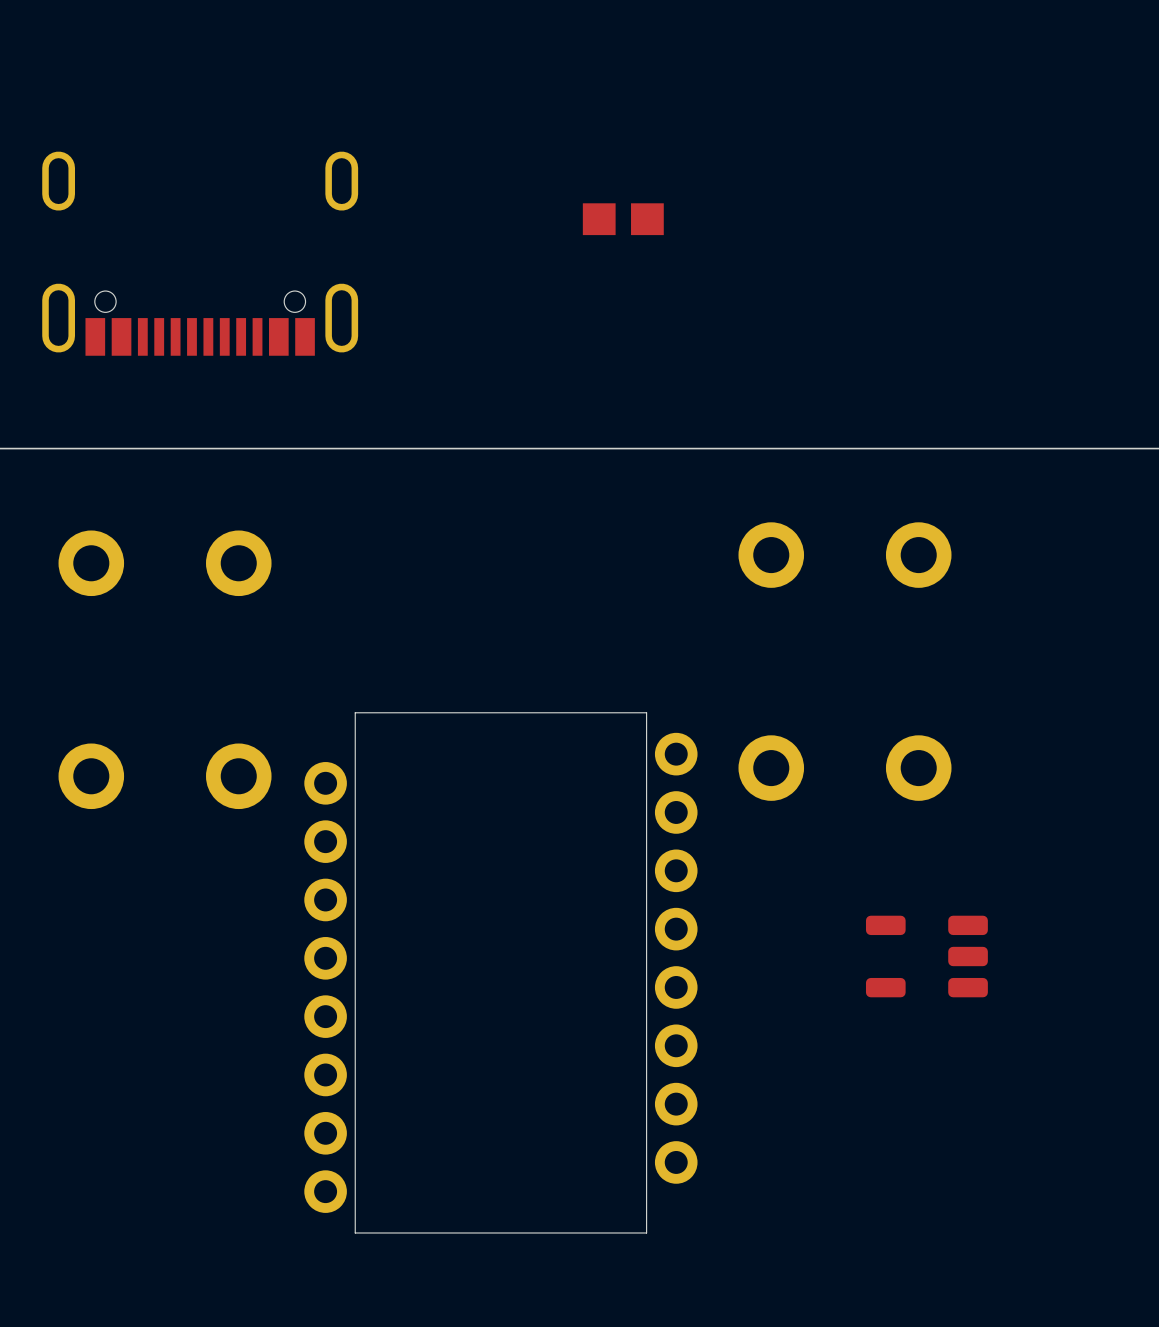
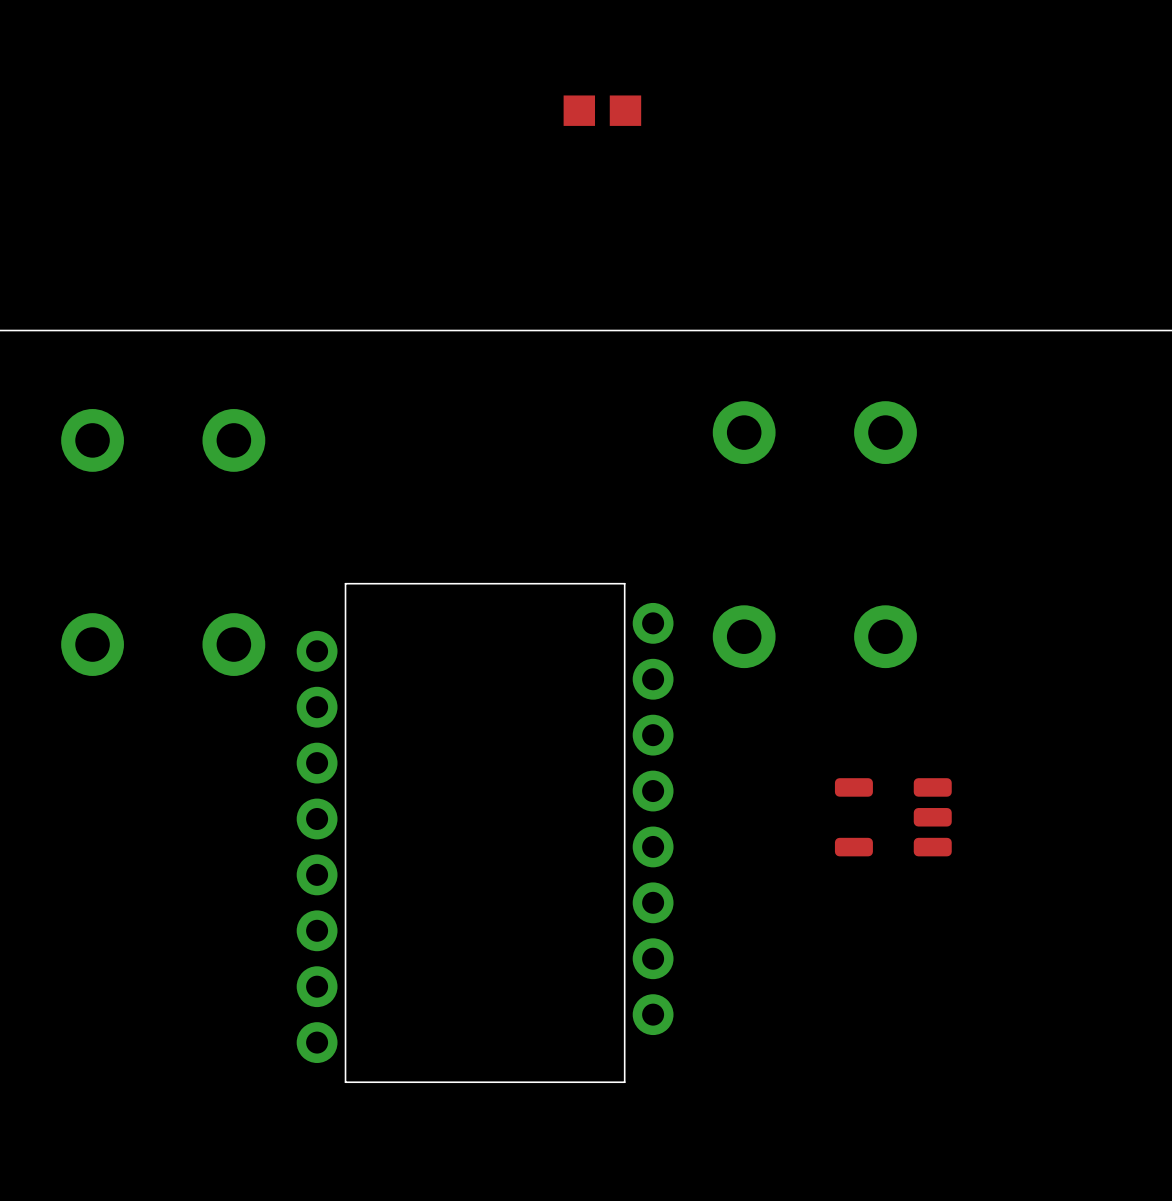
part: (200, 253) -> none

